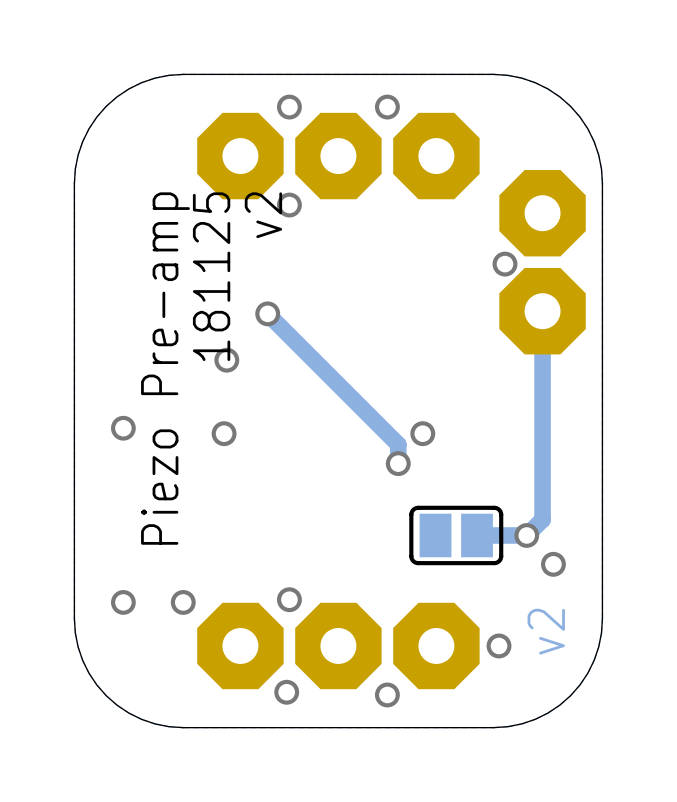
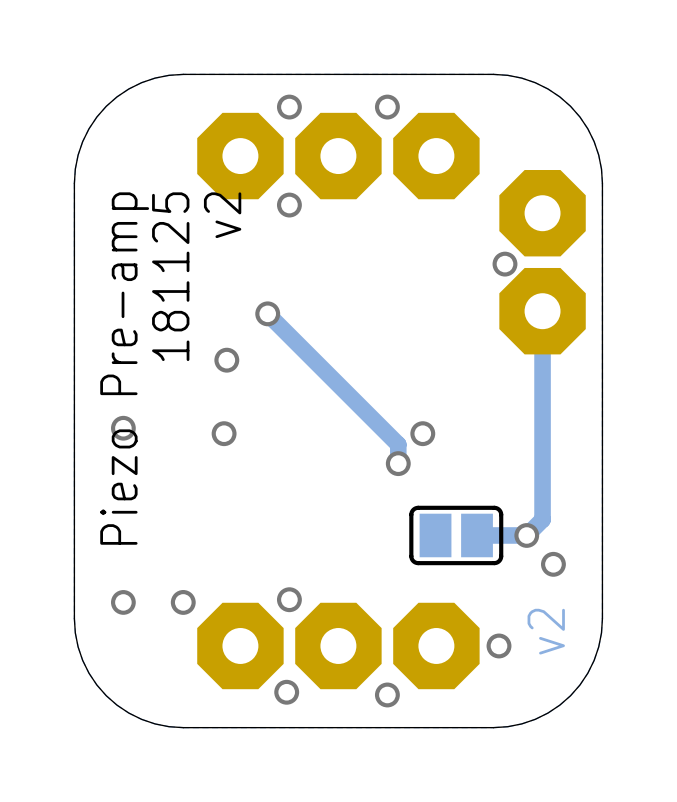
text position: v2 (263, 215) -> v2 (222, 215)
text position: 181125 (211, 276) -> 181125 (170, 276)
text position: Piezo Pre-amp (165, 368) -> Piezo Pre-amp (124, 368)

